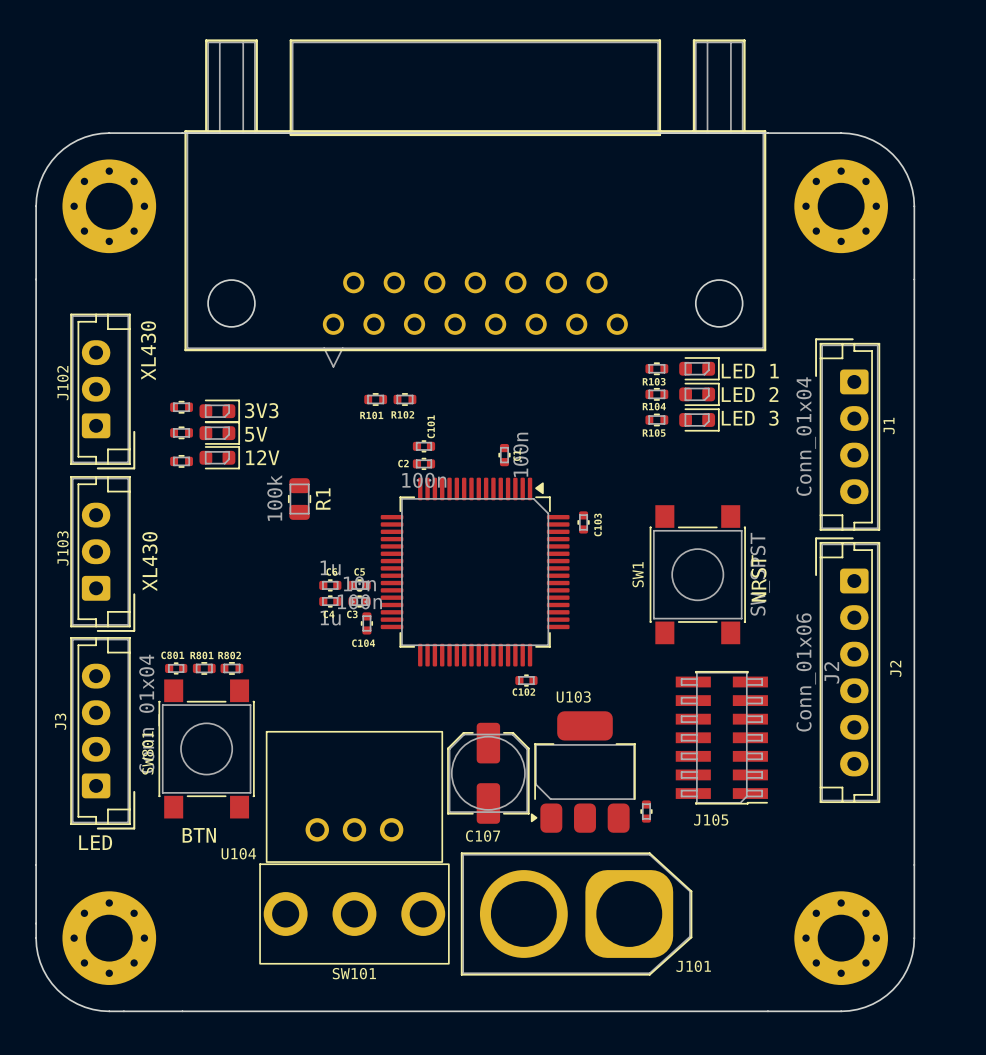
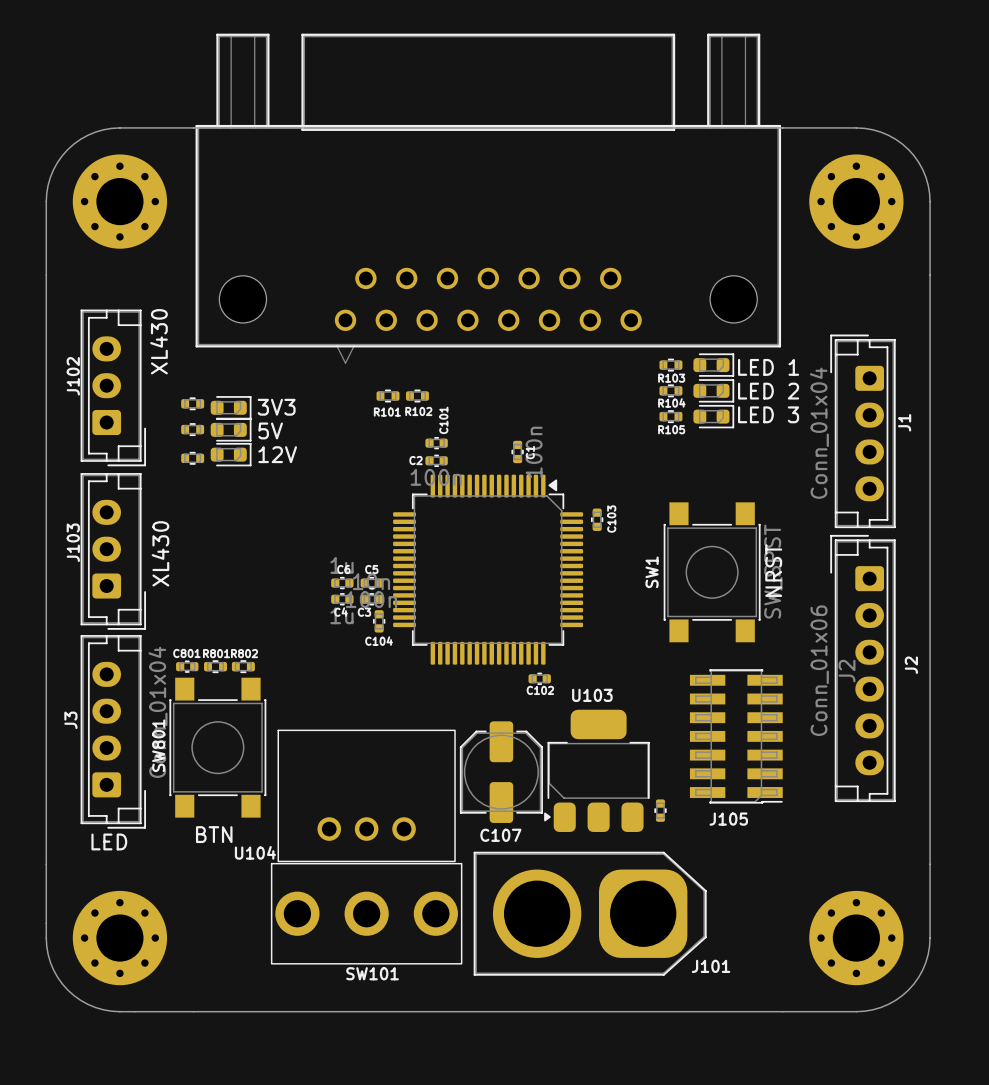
R1: 100k (299, 499) -> none

